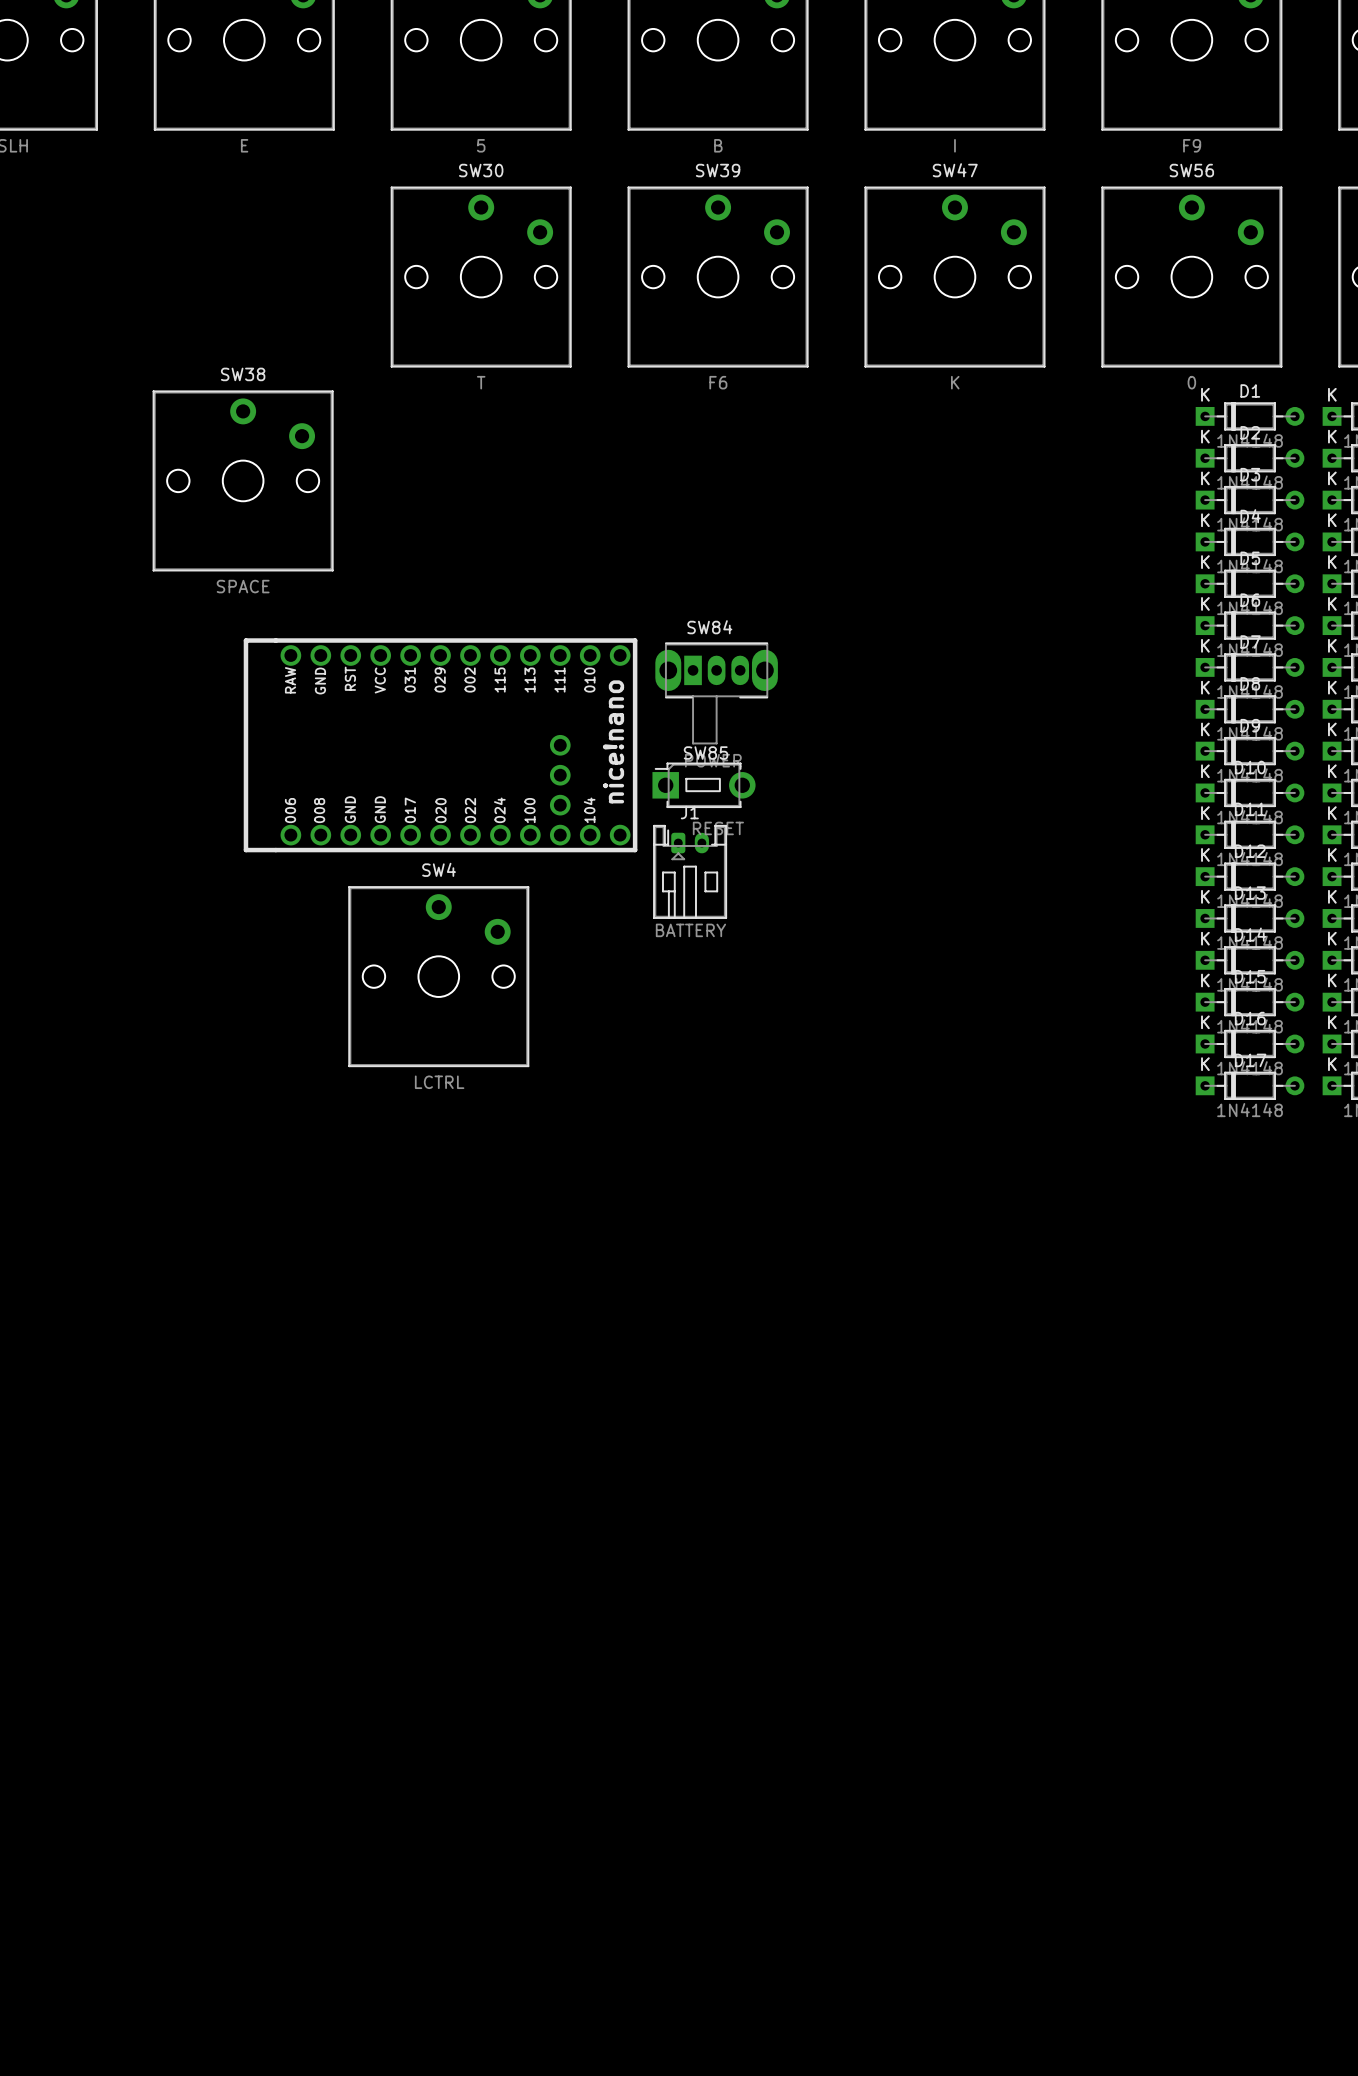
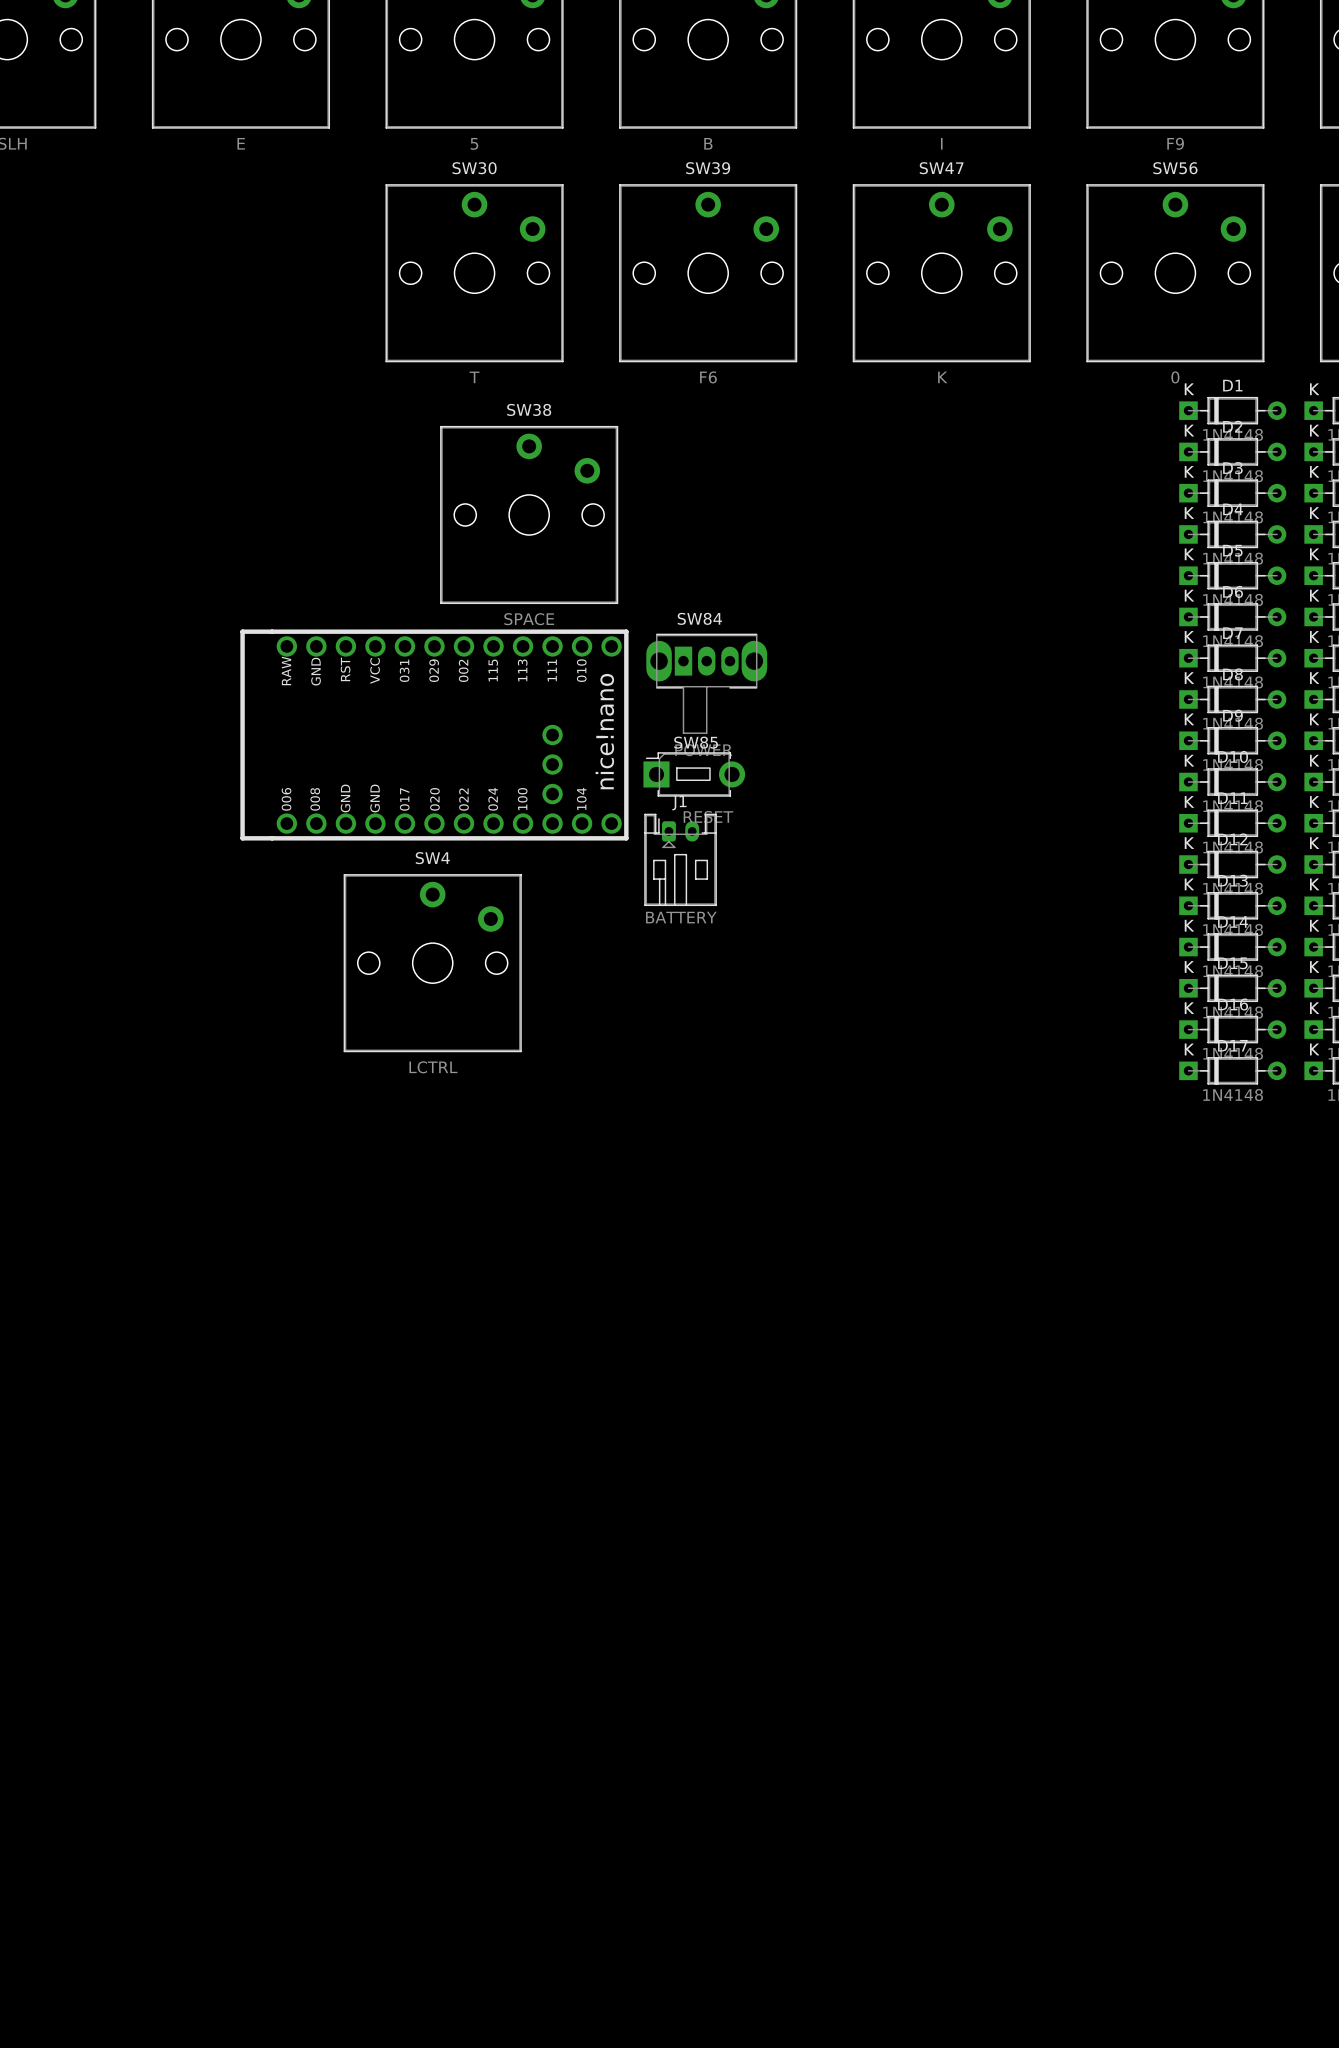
SW38 position: (243, 480) -> (529, 514)

